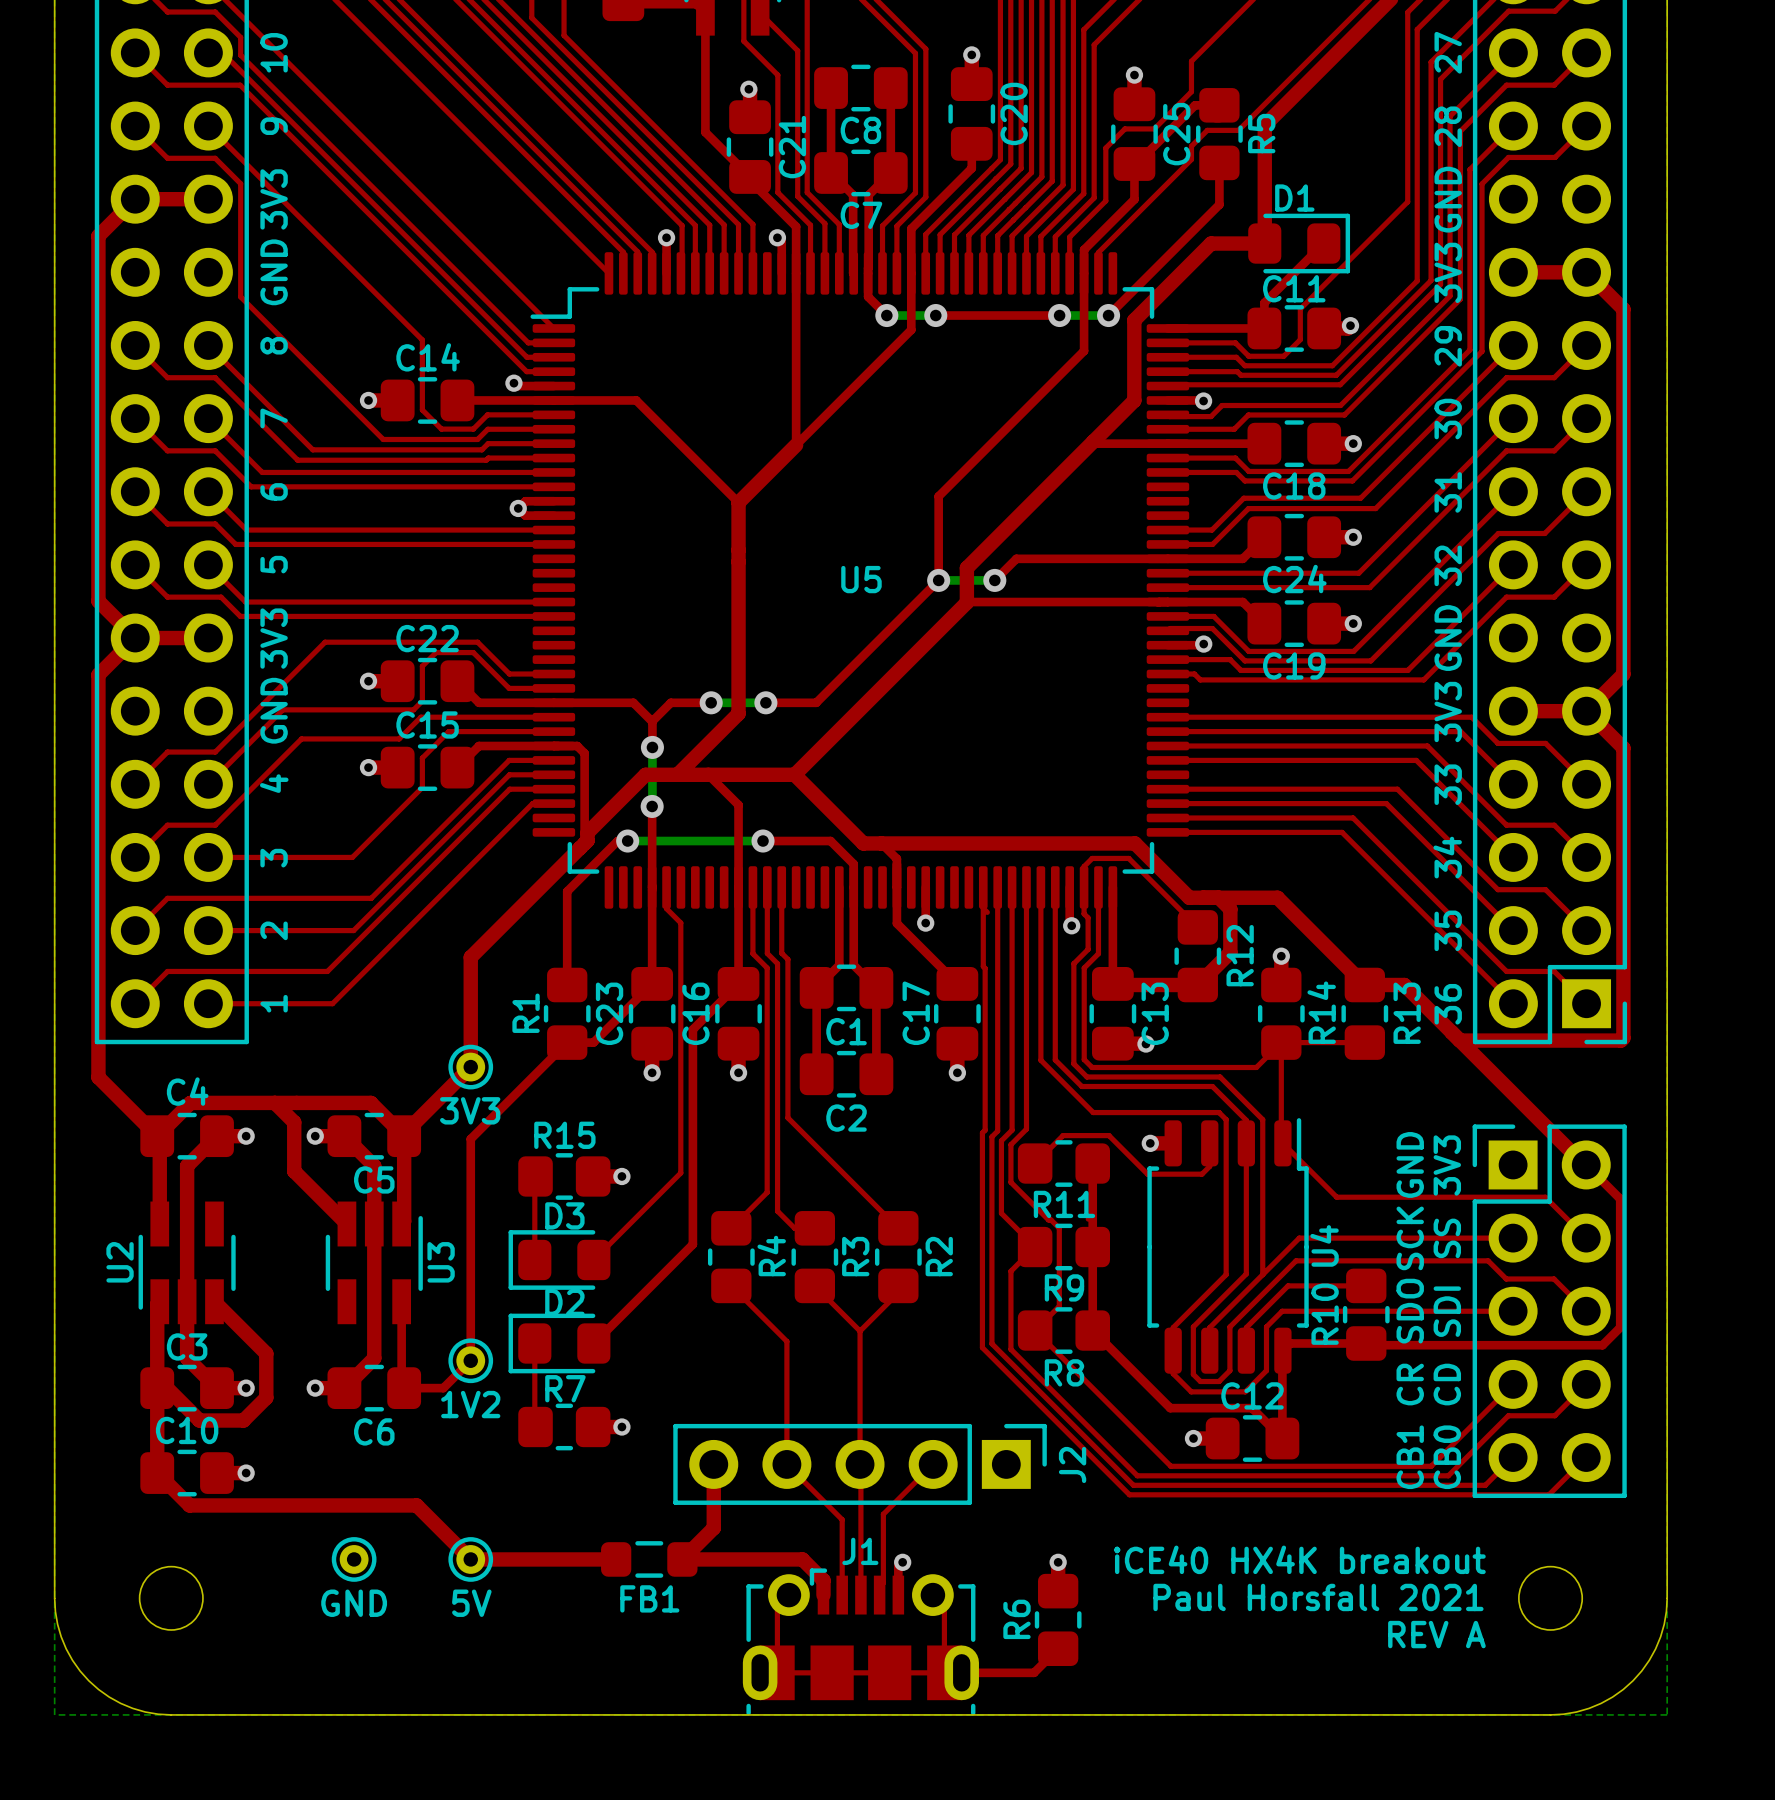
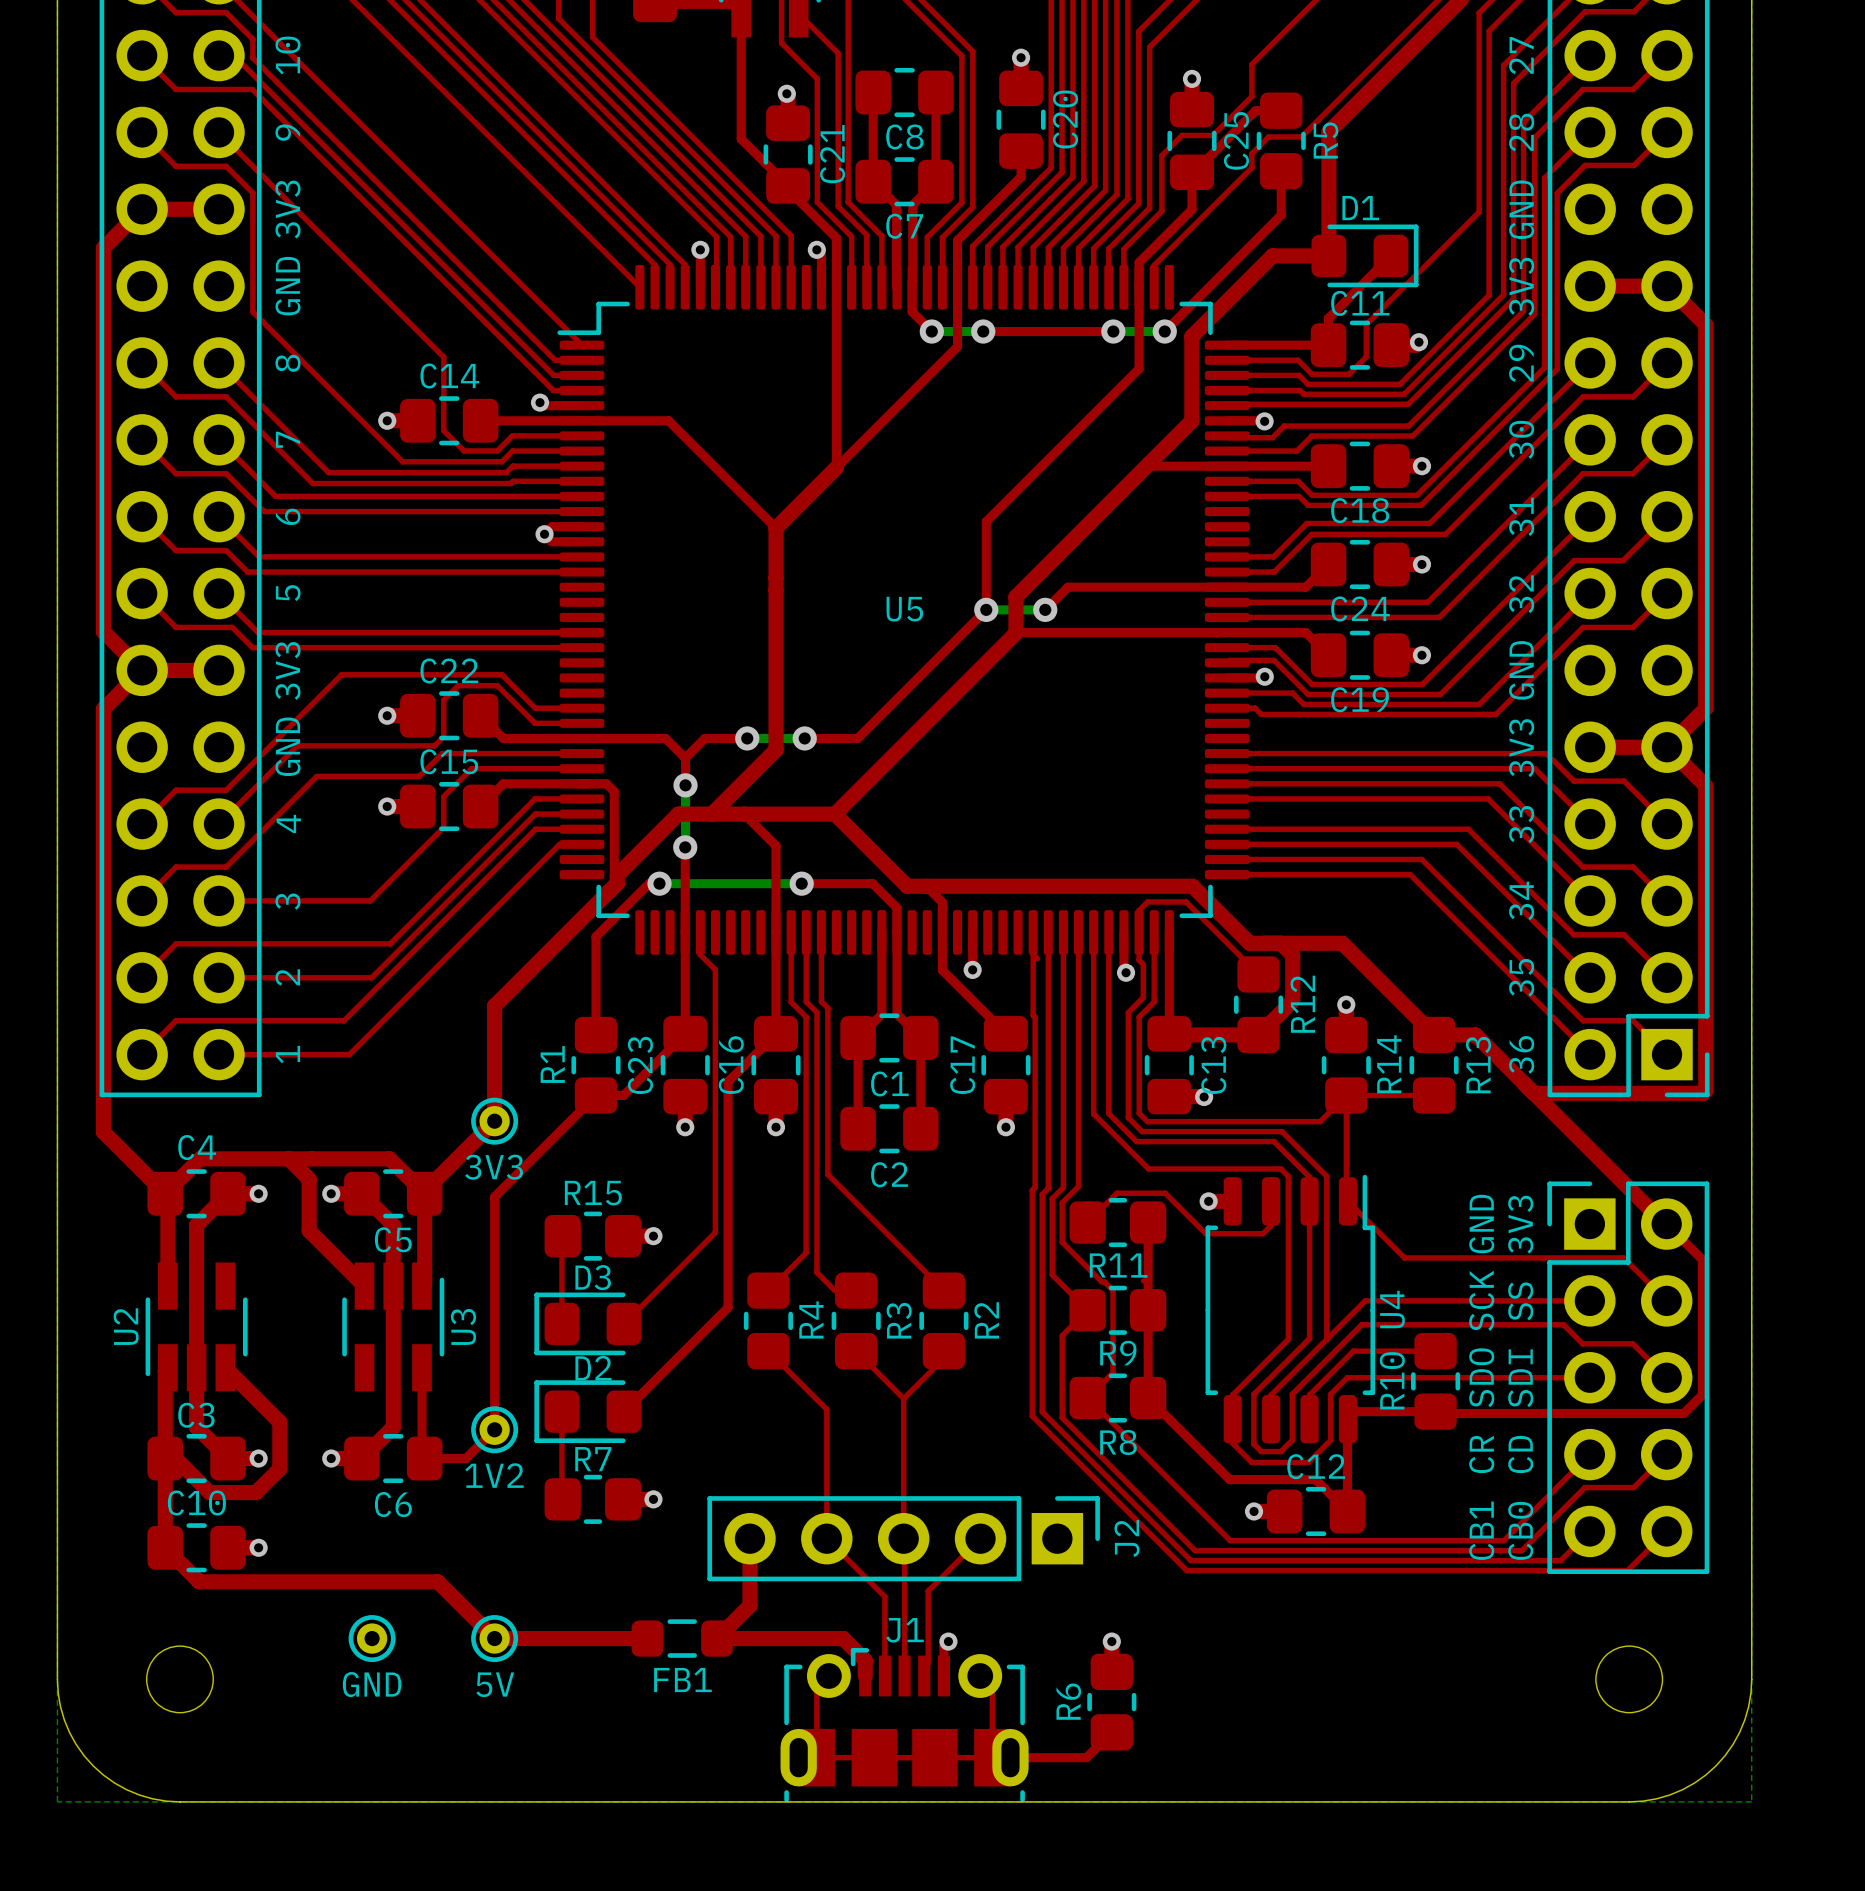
text: iCE40 HX4K breakout (1299, 1559) -> none
text: Paul Horsfall 2021 (1318, 1597) -> none
text: REV A (1436, 1634) -> none

